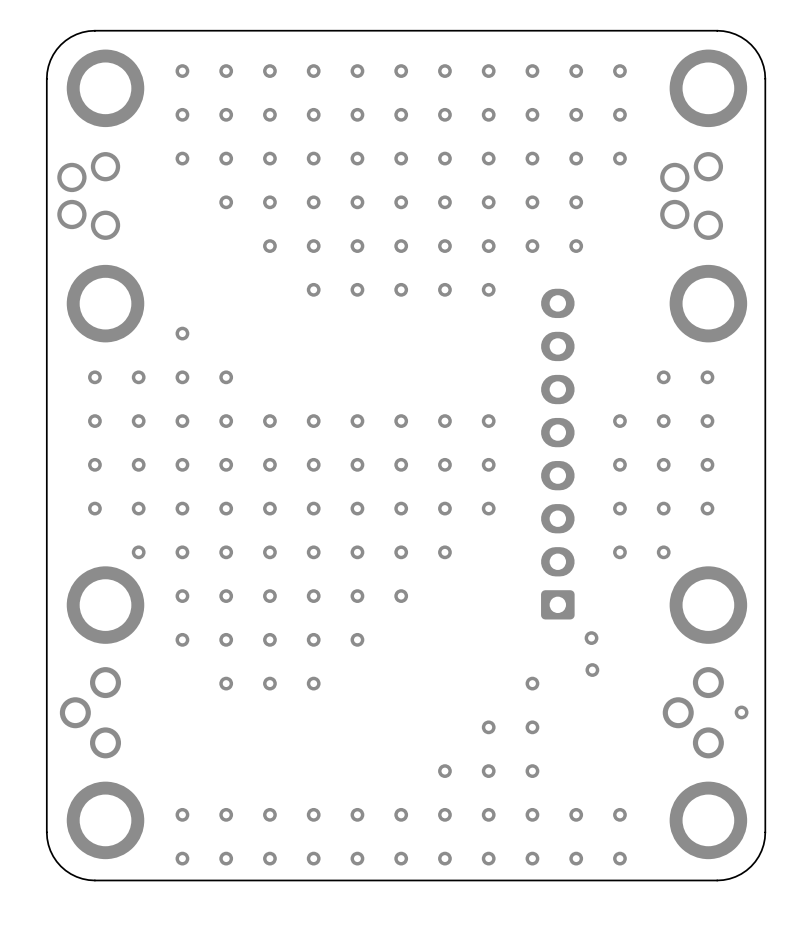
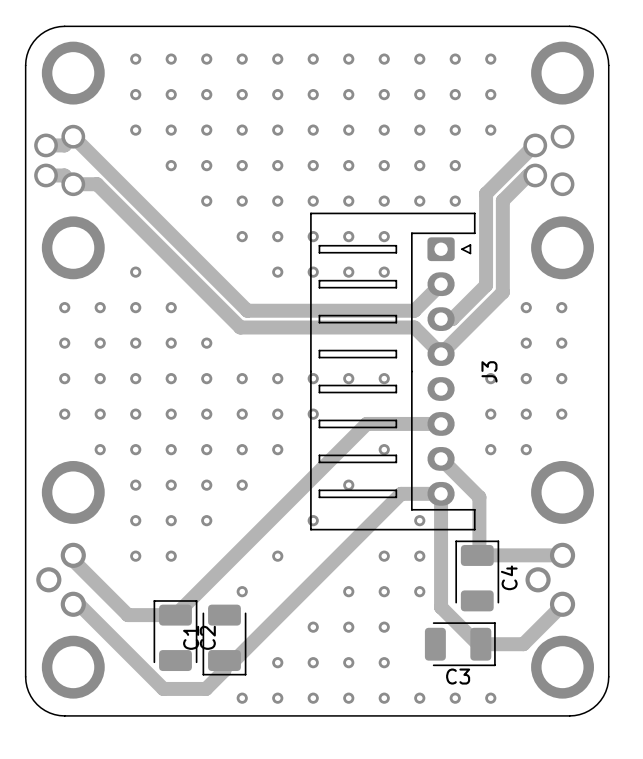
track: none -> (46, 145) (64, 145) (73, 136) (247, 310) (414, 310) (441, 284)
track: none -> (535, 145) (486, 193) (486, 285) (452, 319) (441, 319)
track: none -> (46, 175) (64, 175) (73, 184) (97, 184) (240, 327) (414, 327) (441, 354) (502, 292) (502, 200) (528, 175) (535, 175)
via: none -> (277, 272)
via: none -> (313, 272)
via: none -> (348, 272)
via: none -> (384, 272)
via: (313, 421) -> none
via: (357, 421) -> none
via: (401, 421) -> none
via: (444, 421) -> none
via: (488, 421) -> none
via: (619, 421) -> none
part: (557, 454) -> none
J3: none -> (392, 371)
via: (444, 508) -> none
via: (488, 508) -> none
track: none -> (441, 423) (366, 423) (175, 615) (127, 615) (73, 560) (73, 555)
via: (401, 552) -> none
via: (444, 552) -> none
via: none -> (384, 449)
track: none -> (441, 458) (479, 497) (479, 553) (477, 555)
via: (357, 596) -> none
via: (401, 596) -> none
via: none -> (348, 485)
via: (591, 638) -> none
via: (313, 639) -> none
via: (357, 639) -> none
via: none -> (313, 520)
via: none -> (419, 520)
via: (592, 670) -> none
track: none -> (477, 555) (562, 555)
via: none -> (135, 556)
via: (269, 683) -> none
via: (313, 683) -> none
via: none -> (277, 556)
via: none -> (384, 556)
C4: none -> (477, 575)
via: (741, 712) -> none
via: none -> (242, 591)
via: none -> (348, 591)
track: none -> (73, 604) (78, 604) (163, 688) (206, 688) (224, 670) (224, 660) (234, 660) (401, 493) (441, 493) (441, 607) (477, 644) (523, 644) (562, 604)
via: none -> (313, 627)
via: (532, 771) -> none
C2: none -> (175, 635)
C1: none -> (224, 640)
C3: none -> (460, 644)
via: (182, 814) -> none
via: (226, 814) -> none
via: (269, 814) -> none
via: (313, 814) -> none
via: (532, 814) -> none
via: (576, 814) -> none
via: (619, 814) -> none
via: (182, 858) -> none
via: (226, 858) -> none
via: (269, 858) -> none

